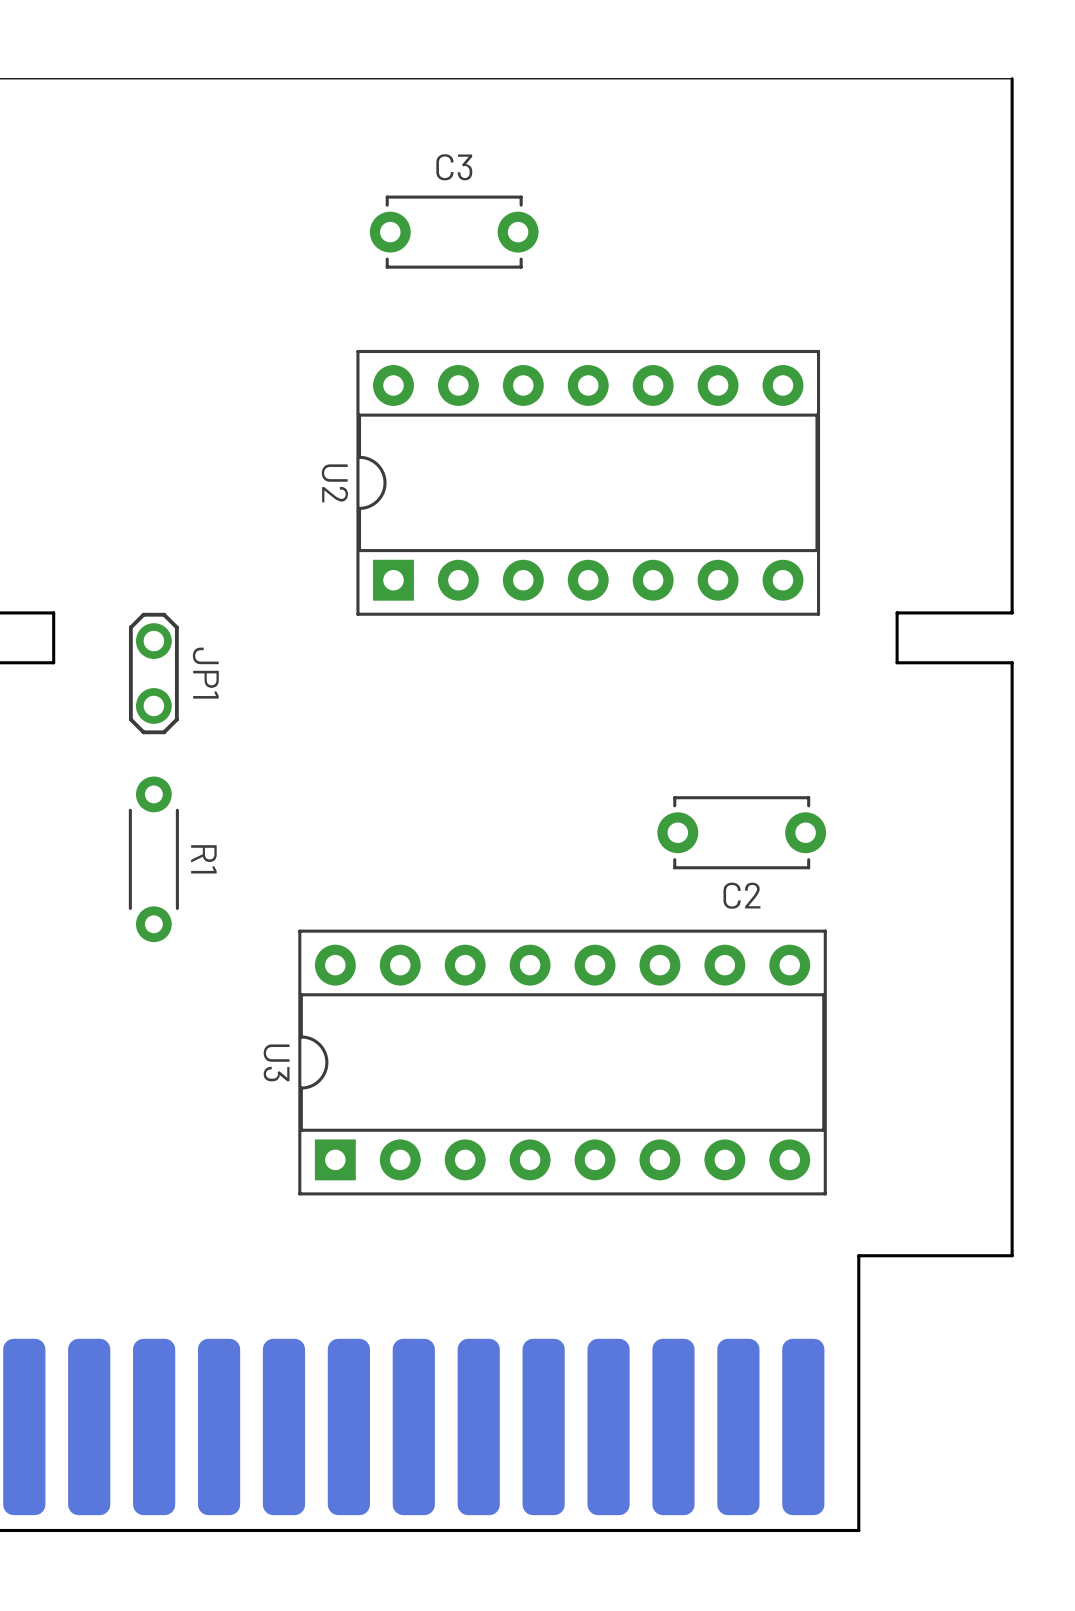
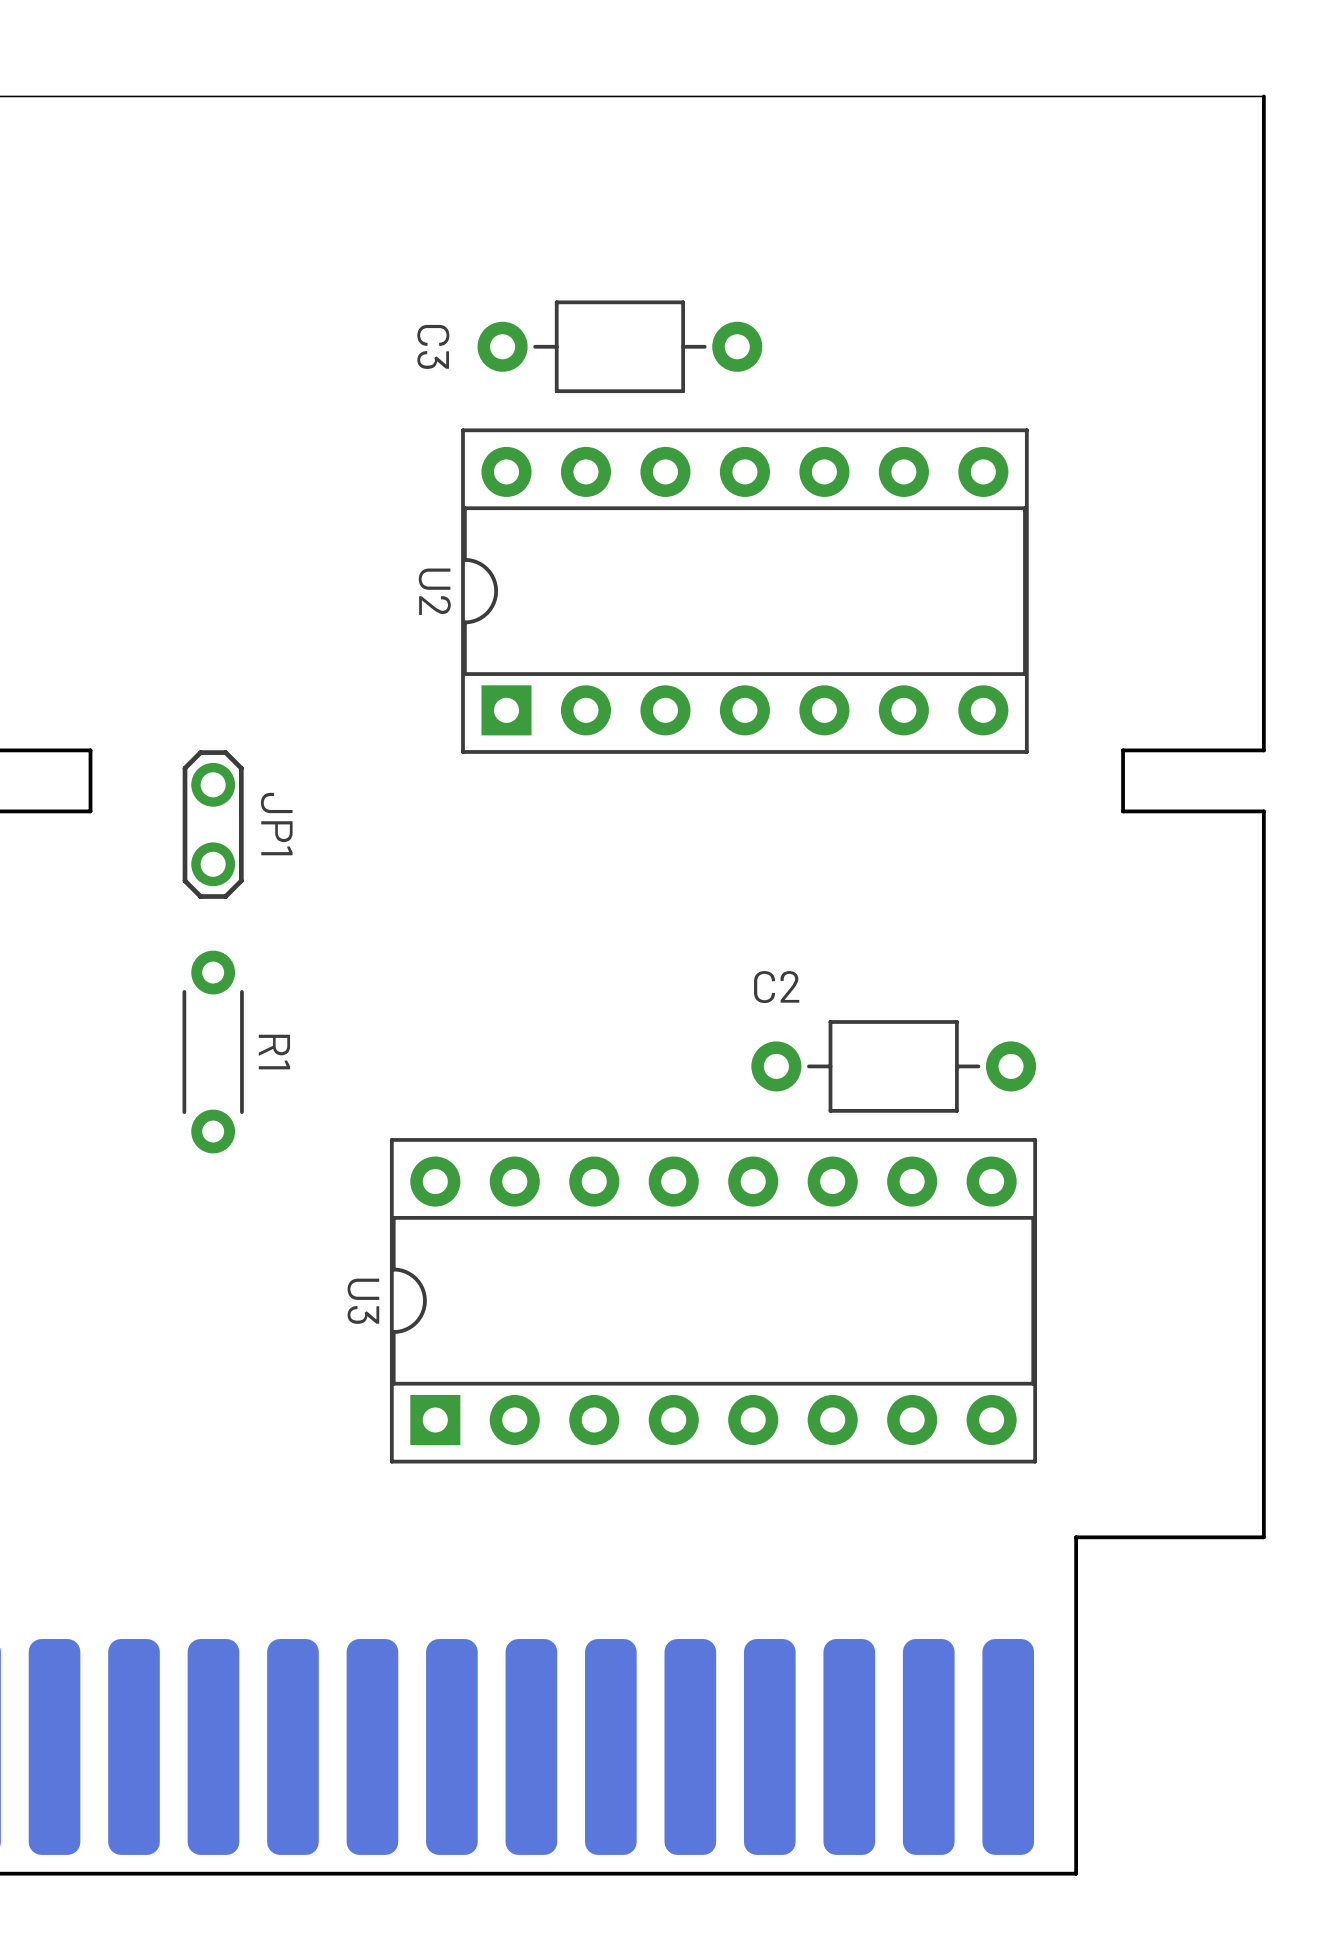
C3 name position: C3 (454, 167) -> C3 (433, 346)
C3 footprint: [369, 195, 539, 269] -> [477, 300, 763, 394]
C2 footprint: [657, 796, 827, 870] -> [751, 1020, 1037, 1113]
C2 name position: C2 (741, 895) -> C2 (776, 987)

